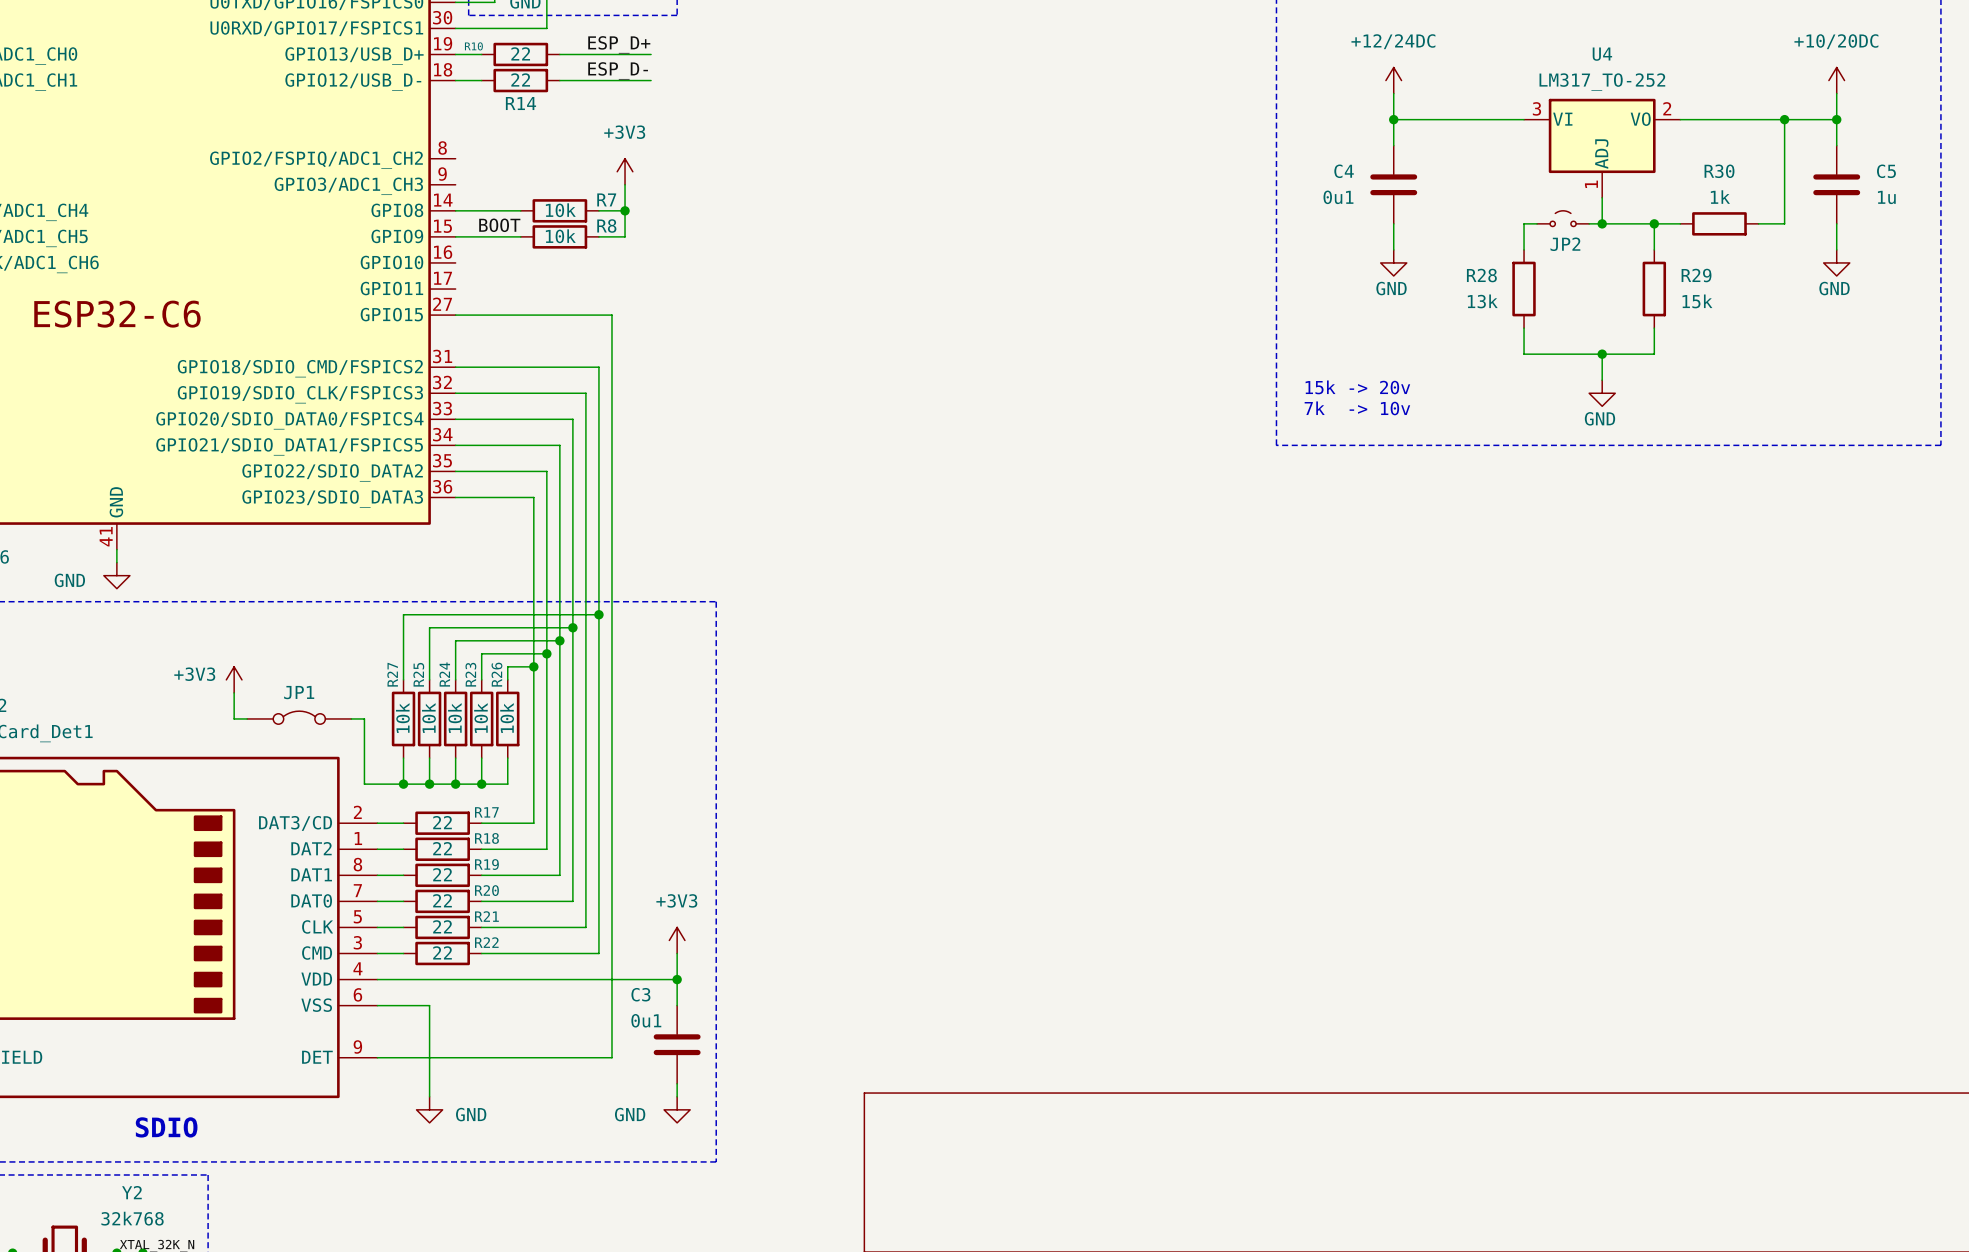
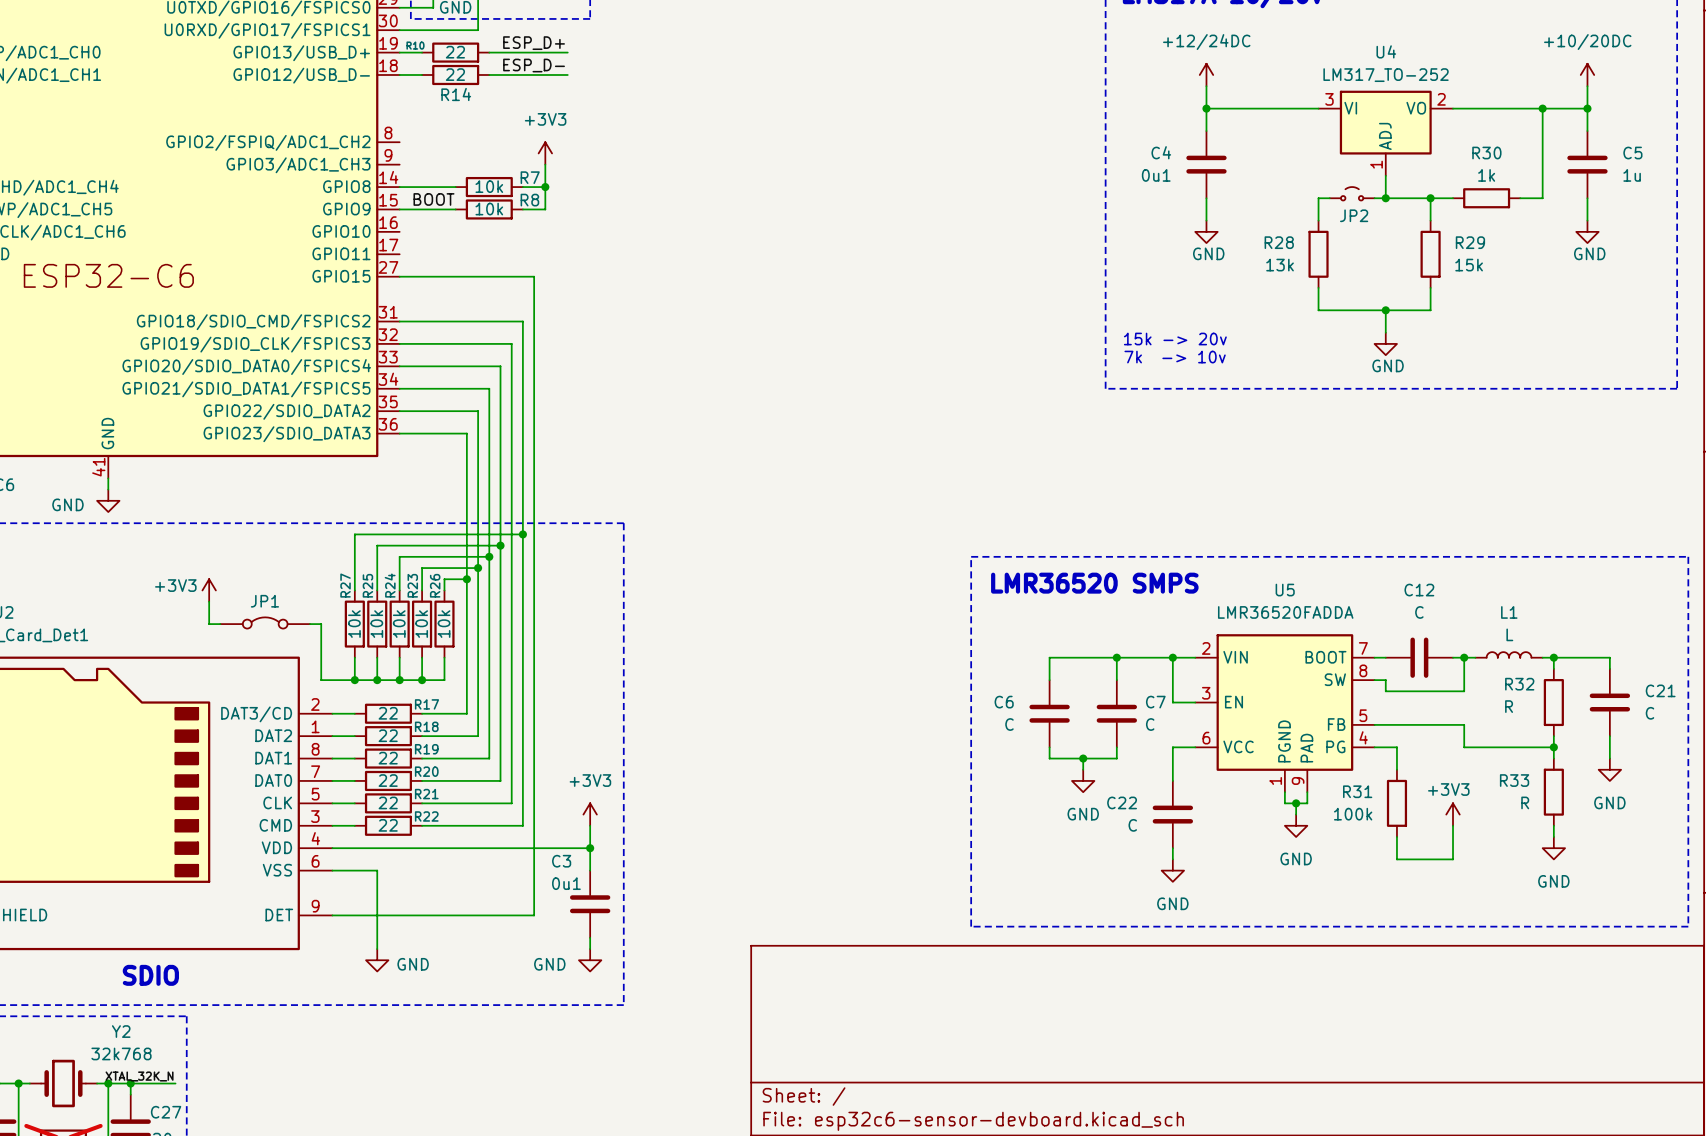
line: none -> (971, 556) (1688, 556) (1688, 926) (971, 926) (971, 556)
text: none -> LMR36520 SMPS (1094, 583)
L1: none -> L (1509, 654)
wire: none -> (1116, 657) (1116, 680)
junction: none -> (1116, 657)
wire: none -> (1172, 657) (1172, 702) (1195, 702)
junction: none -> (1172, 657)
wire: none -> (1195, 657) (1049, 657) (1049, 680)
wire: none -> (1374, 657) (1385, 657)
C12: none -> C (1419, 657)
wire: none -> (1453, 657) (1475, 657)
wire: none -> (1464, 657) (1464, 691) (1385, 691) (1385, 680) (1374, 680)
junction: none -> (1464, 657)
wire: none -> (1542, 657) (1609, 657) (1609, 668)
wire: none -> (1553, 657) (1553, 668)
junction: none -> (1553, 657)
R32: none -> R (1553, 702)
C21: none -> C (1609, 702)
U5: none -> LMR36520FADDA (1284, 713)
C6: none -> C (1049, 713)
C7: none -> C (1116, 713)
wire: none -> (1374, 724) (1464, 724) (1464, 747) (1553, 747)
wire: none -> (1553, 736) (1553, 758)
wire: none -> (1609, 736) (1609, 758)
wire: none -> (1049, 747) (1049, 758) (1116, 758) (1116, 747)
wire: none -> (1195, 747) (1172, 747) (1172, 780)
wire: none -> (1374, 747) (1396, 747) (1396, 769)
junction: none -> (1553, 747)
wire: none -> (1083, 758) (1083, 769)
junction: none -> (1083, 758)
power symbol: none -> GND (1609, 769)
power symbol: none -> GND (1083, 780)
wire: none -> (1284, 792) (1284, 803) (1307, 803) (1307, 792)
R33: none -> R (1553, 792)
wire: none -> (1296, 803) (1296, 814)
junction: none -> (1296, 803)
R31: none -> 100k (1396, 803)
C22: none -> C (1172, 814)
power symbol: none -> +3V3 (1453, 814)
power symbol: none -> GND (1296, 825)
wire: none -> (1453, 825) (1453, 859) (1396, 859) (1396, 836)
wire: none -> (1553, 825) (1553, 836)
wire: none -> (1172, 848) (1172, 859)
power symbol: none -> GND (1553, 848)
power symbol: none -> GND (1172, 870)

